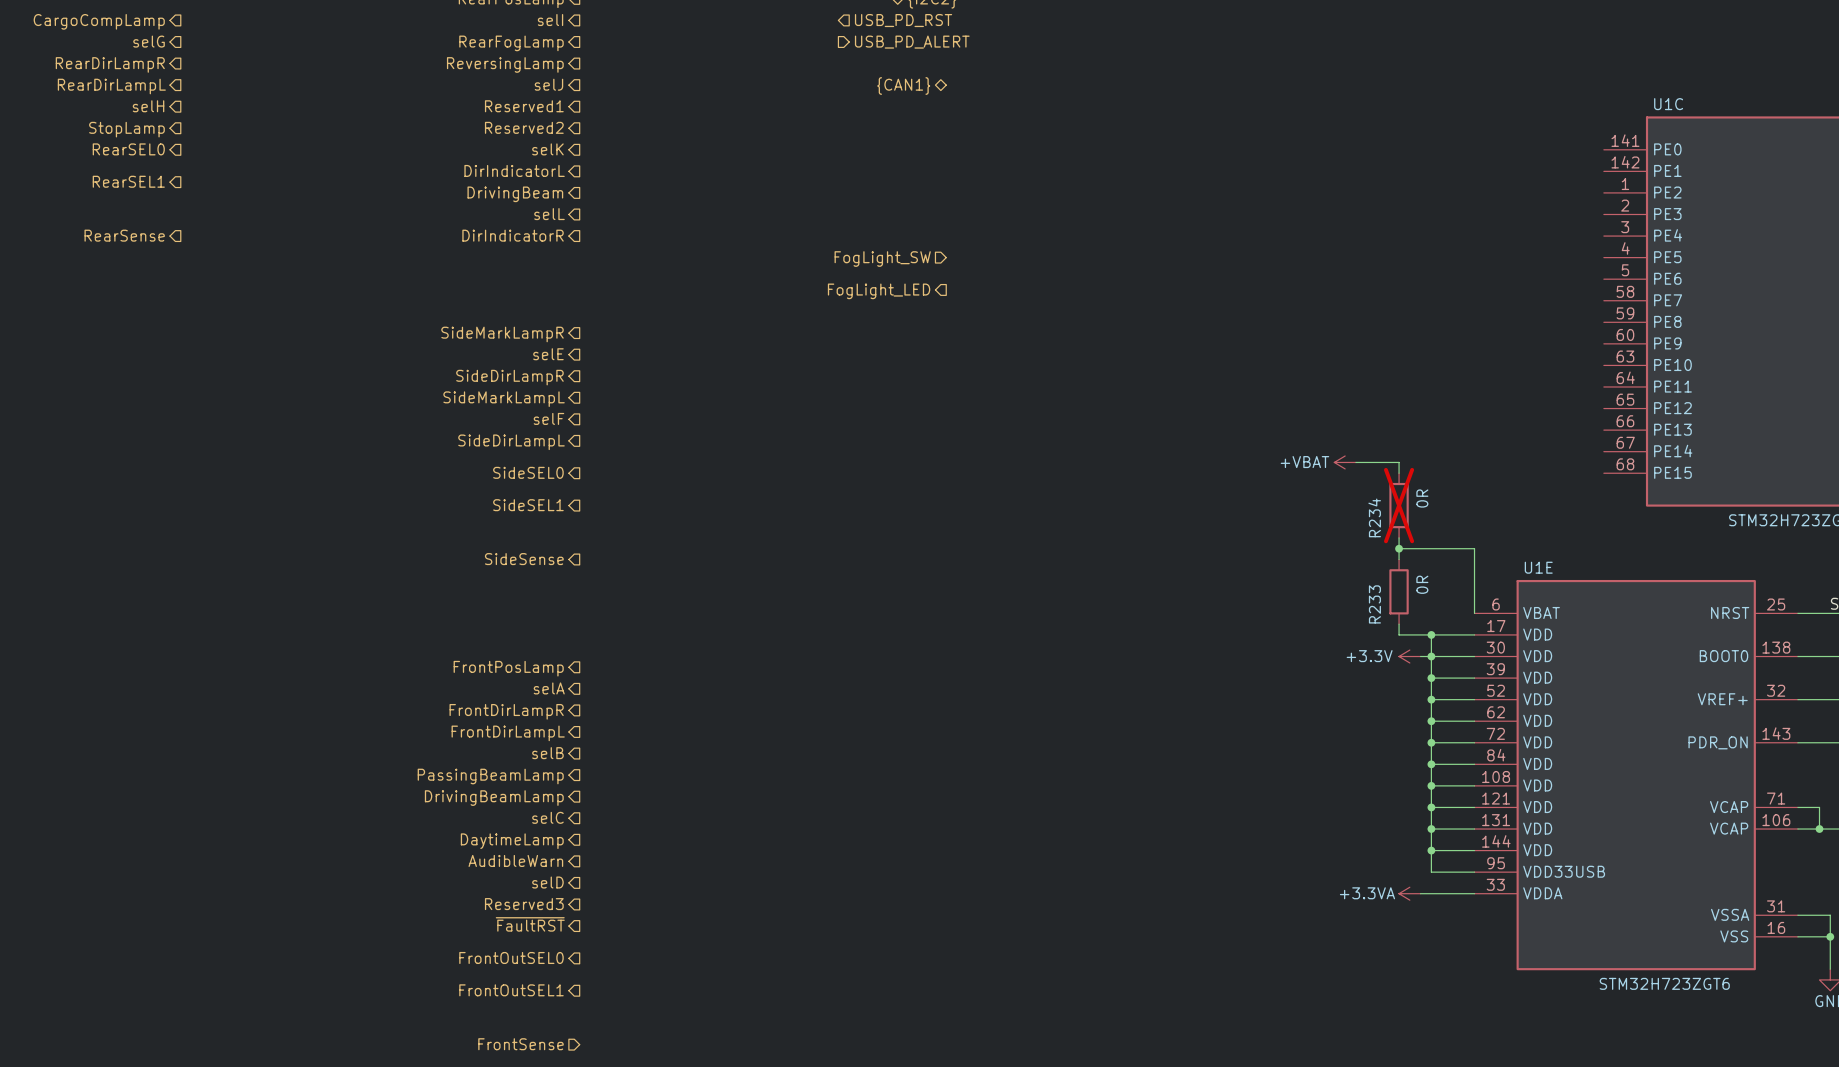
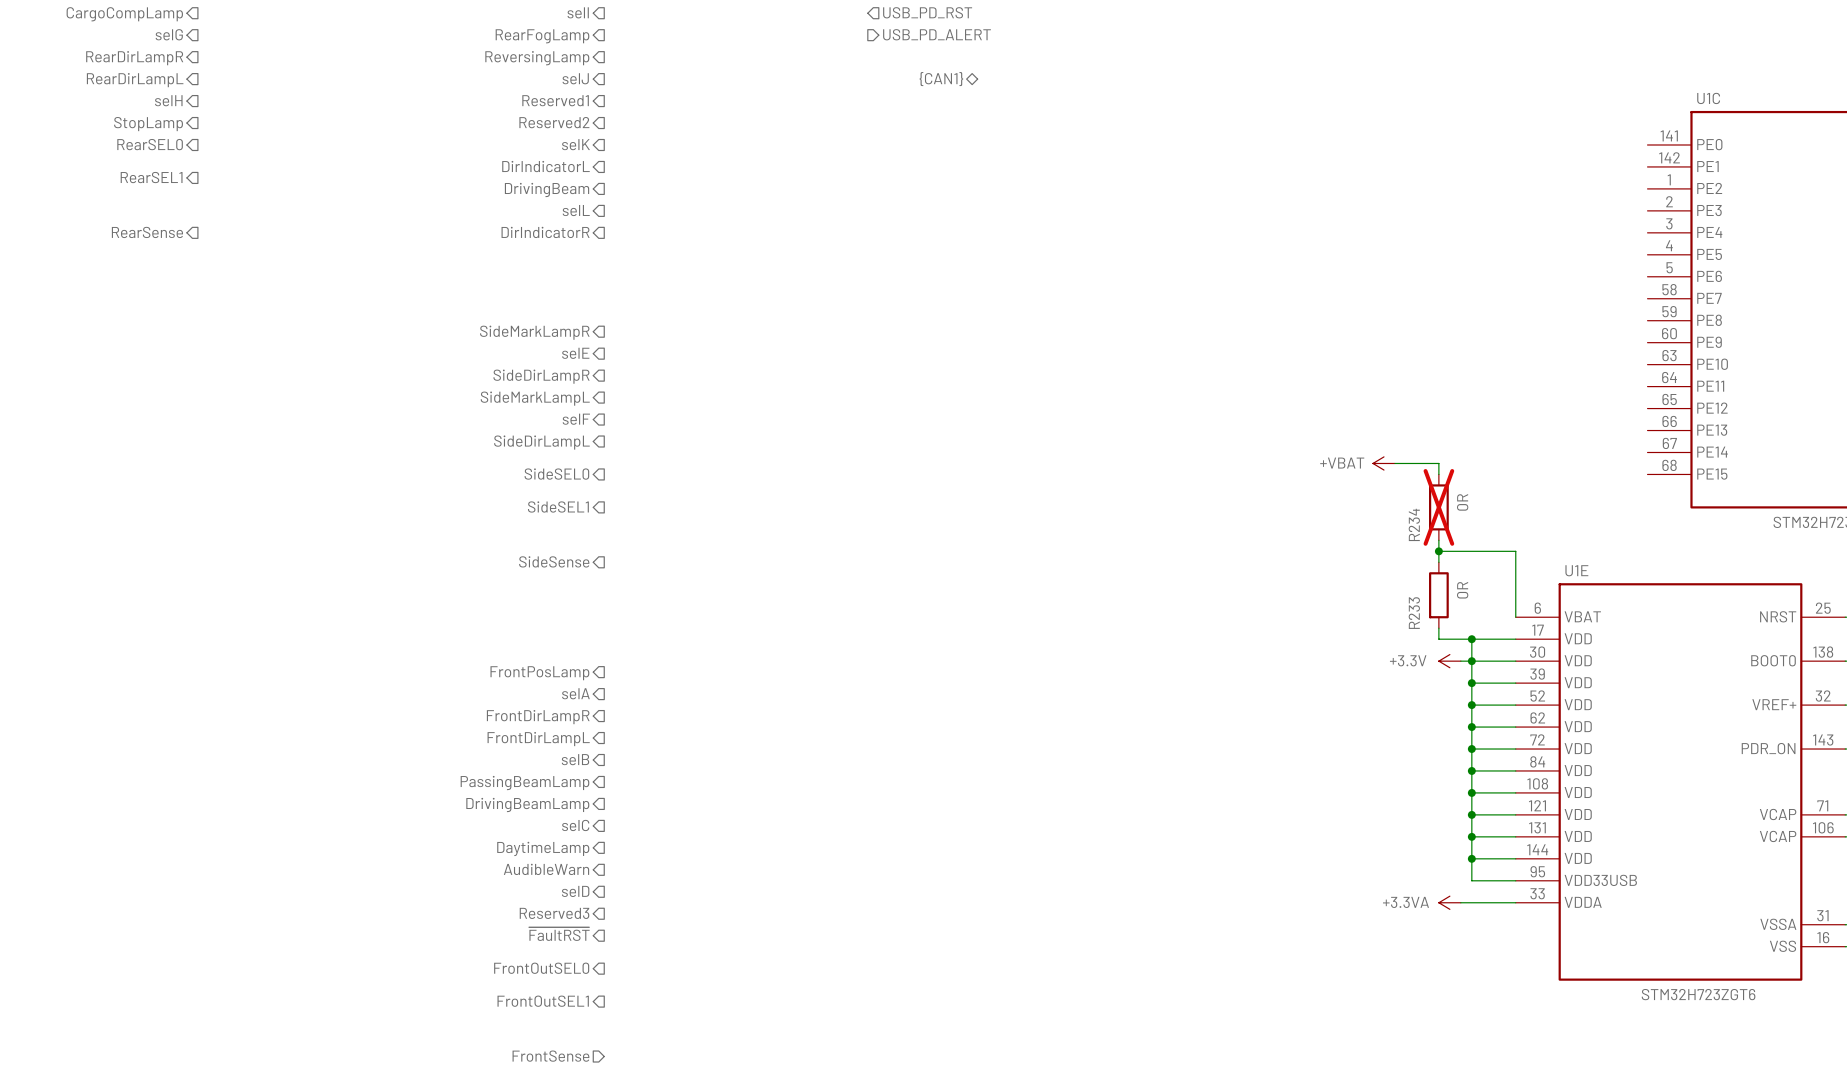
hierarchical label: FogLight_SW (882, 259) -> none
hierarchical label: FogLight_LED (879, 291) -> none

